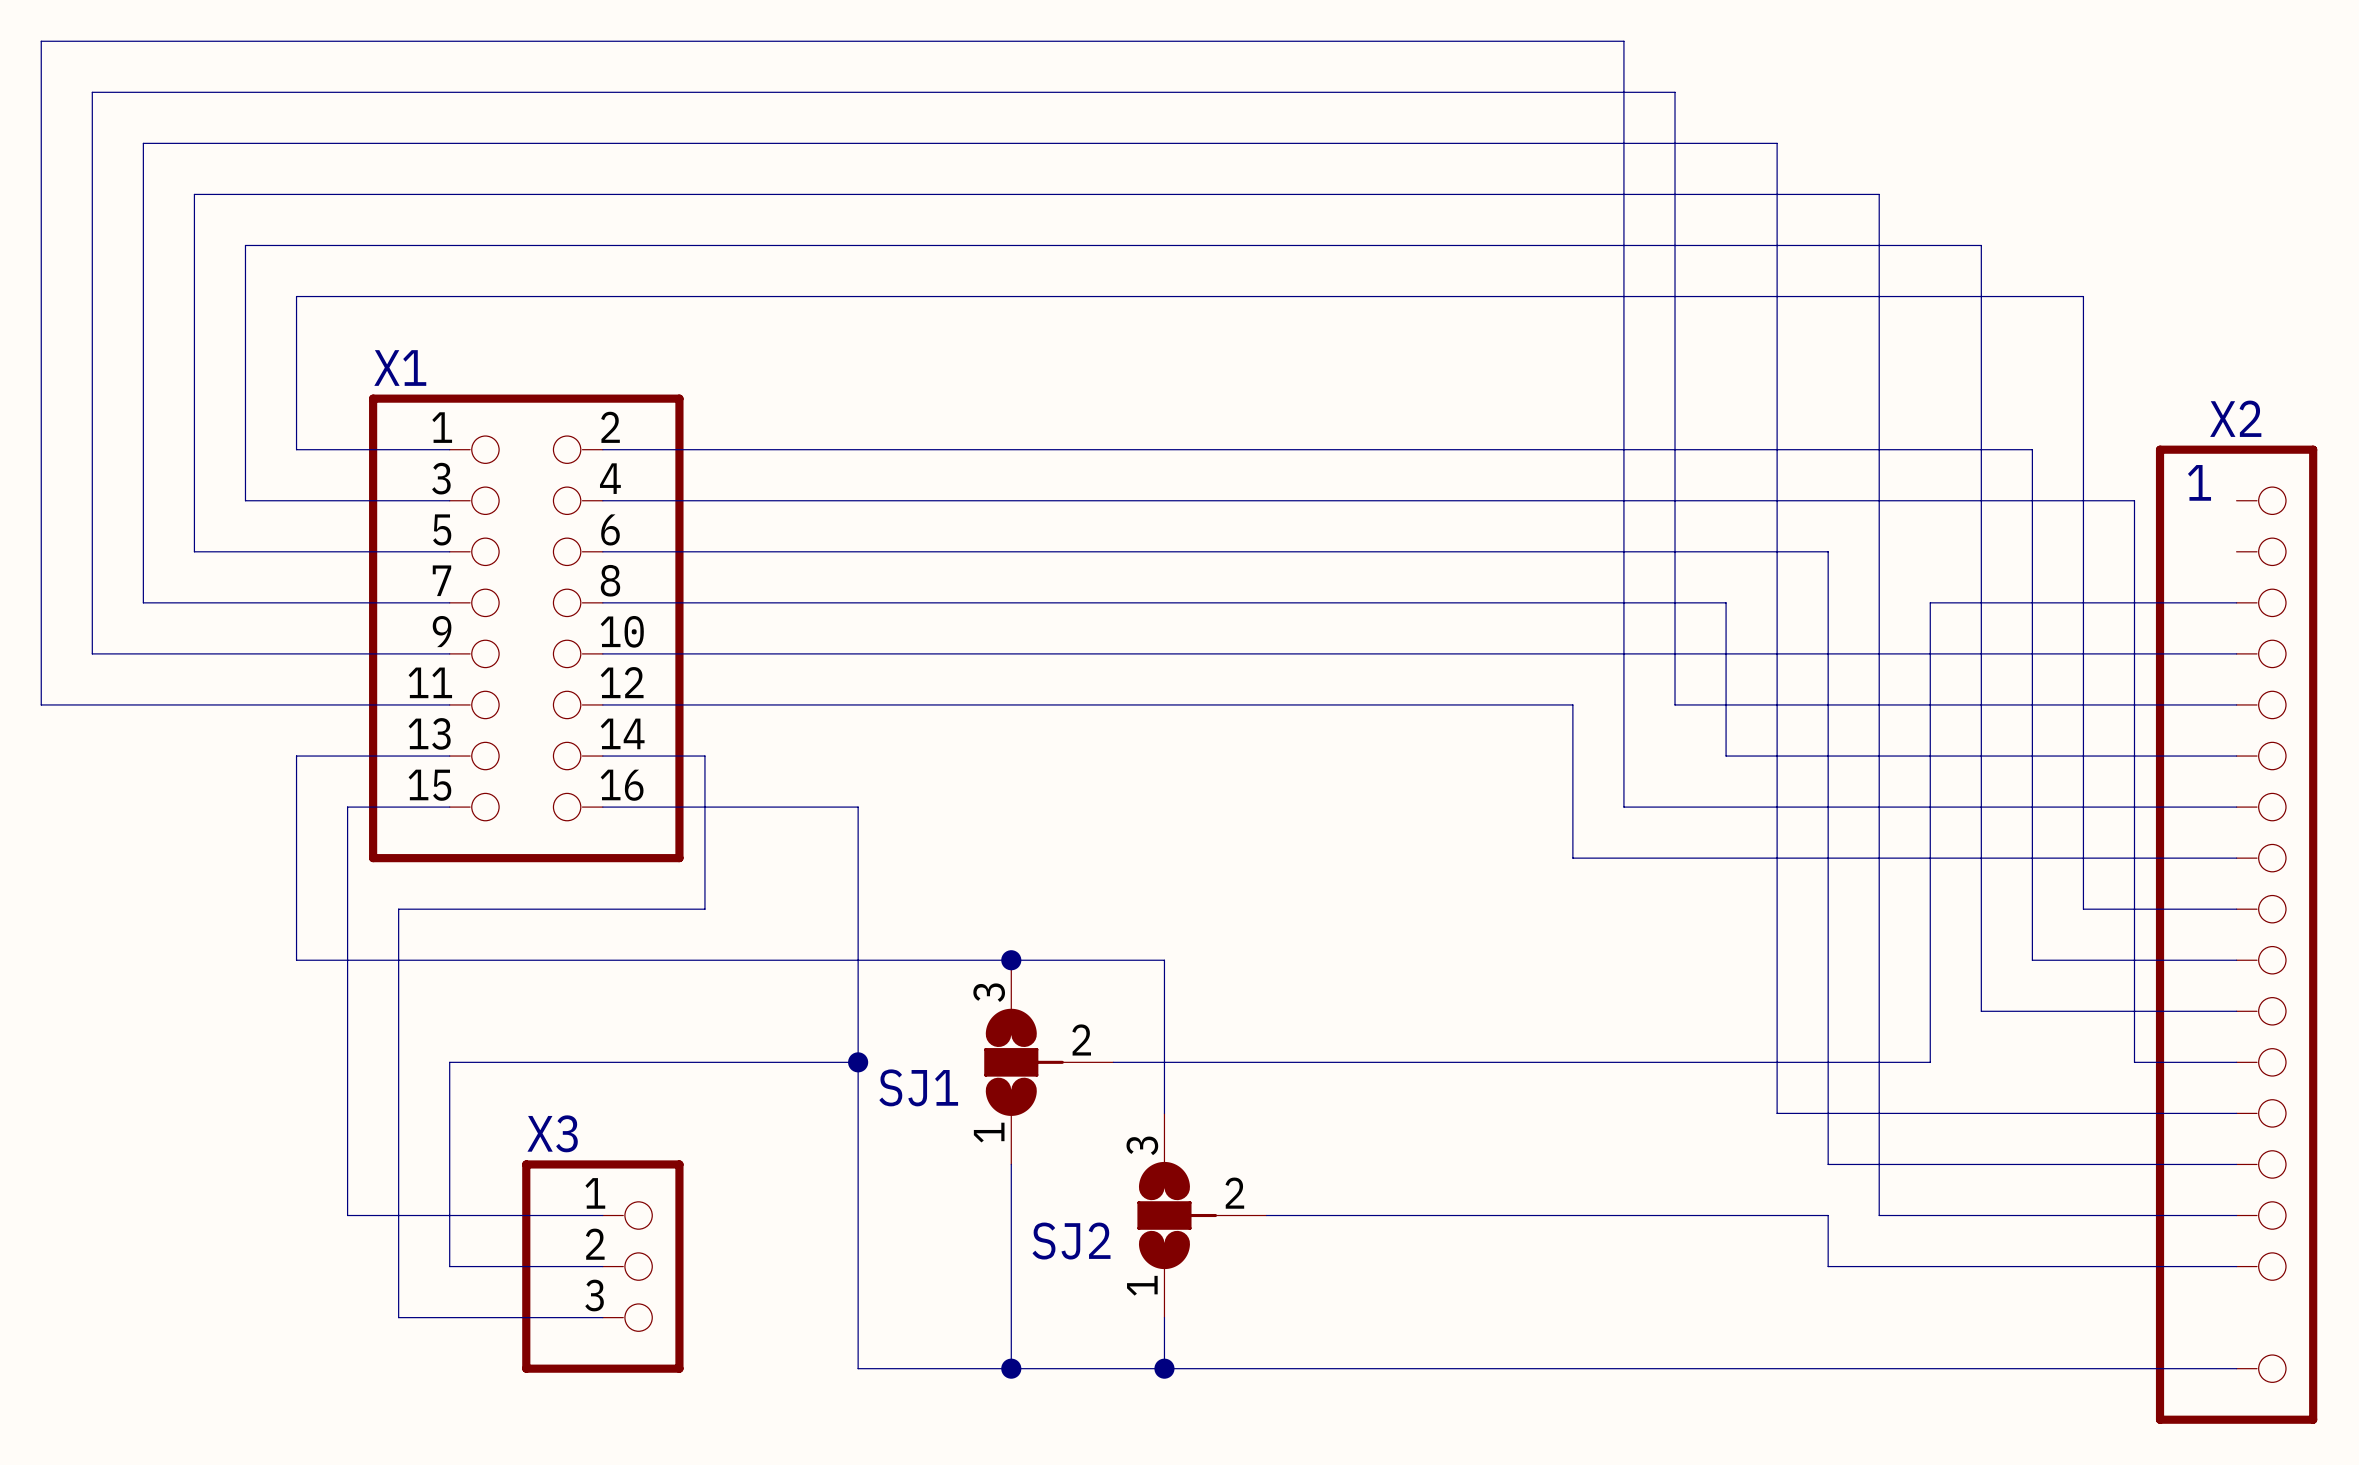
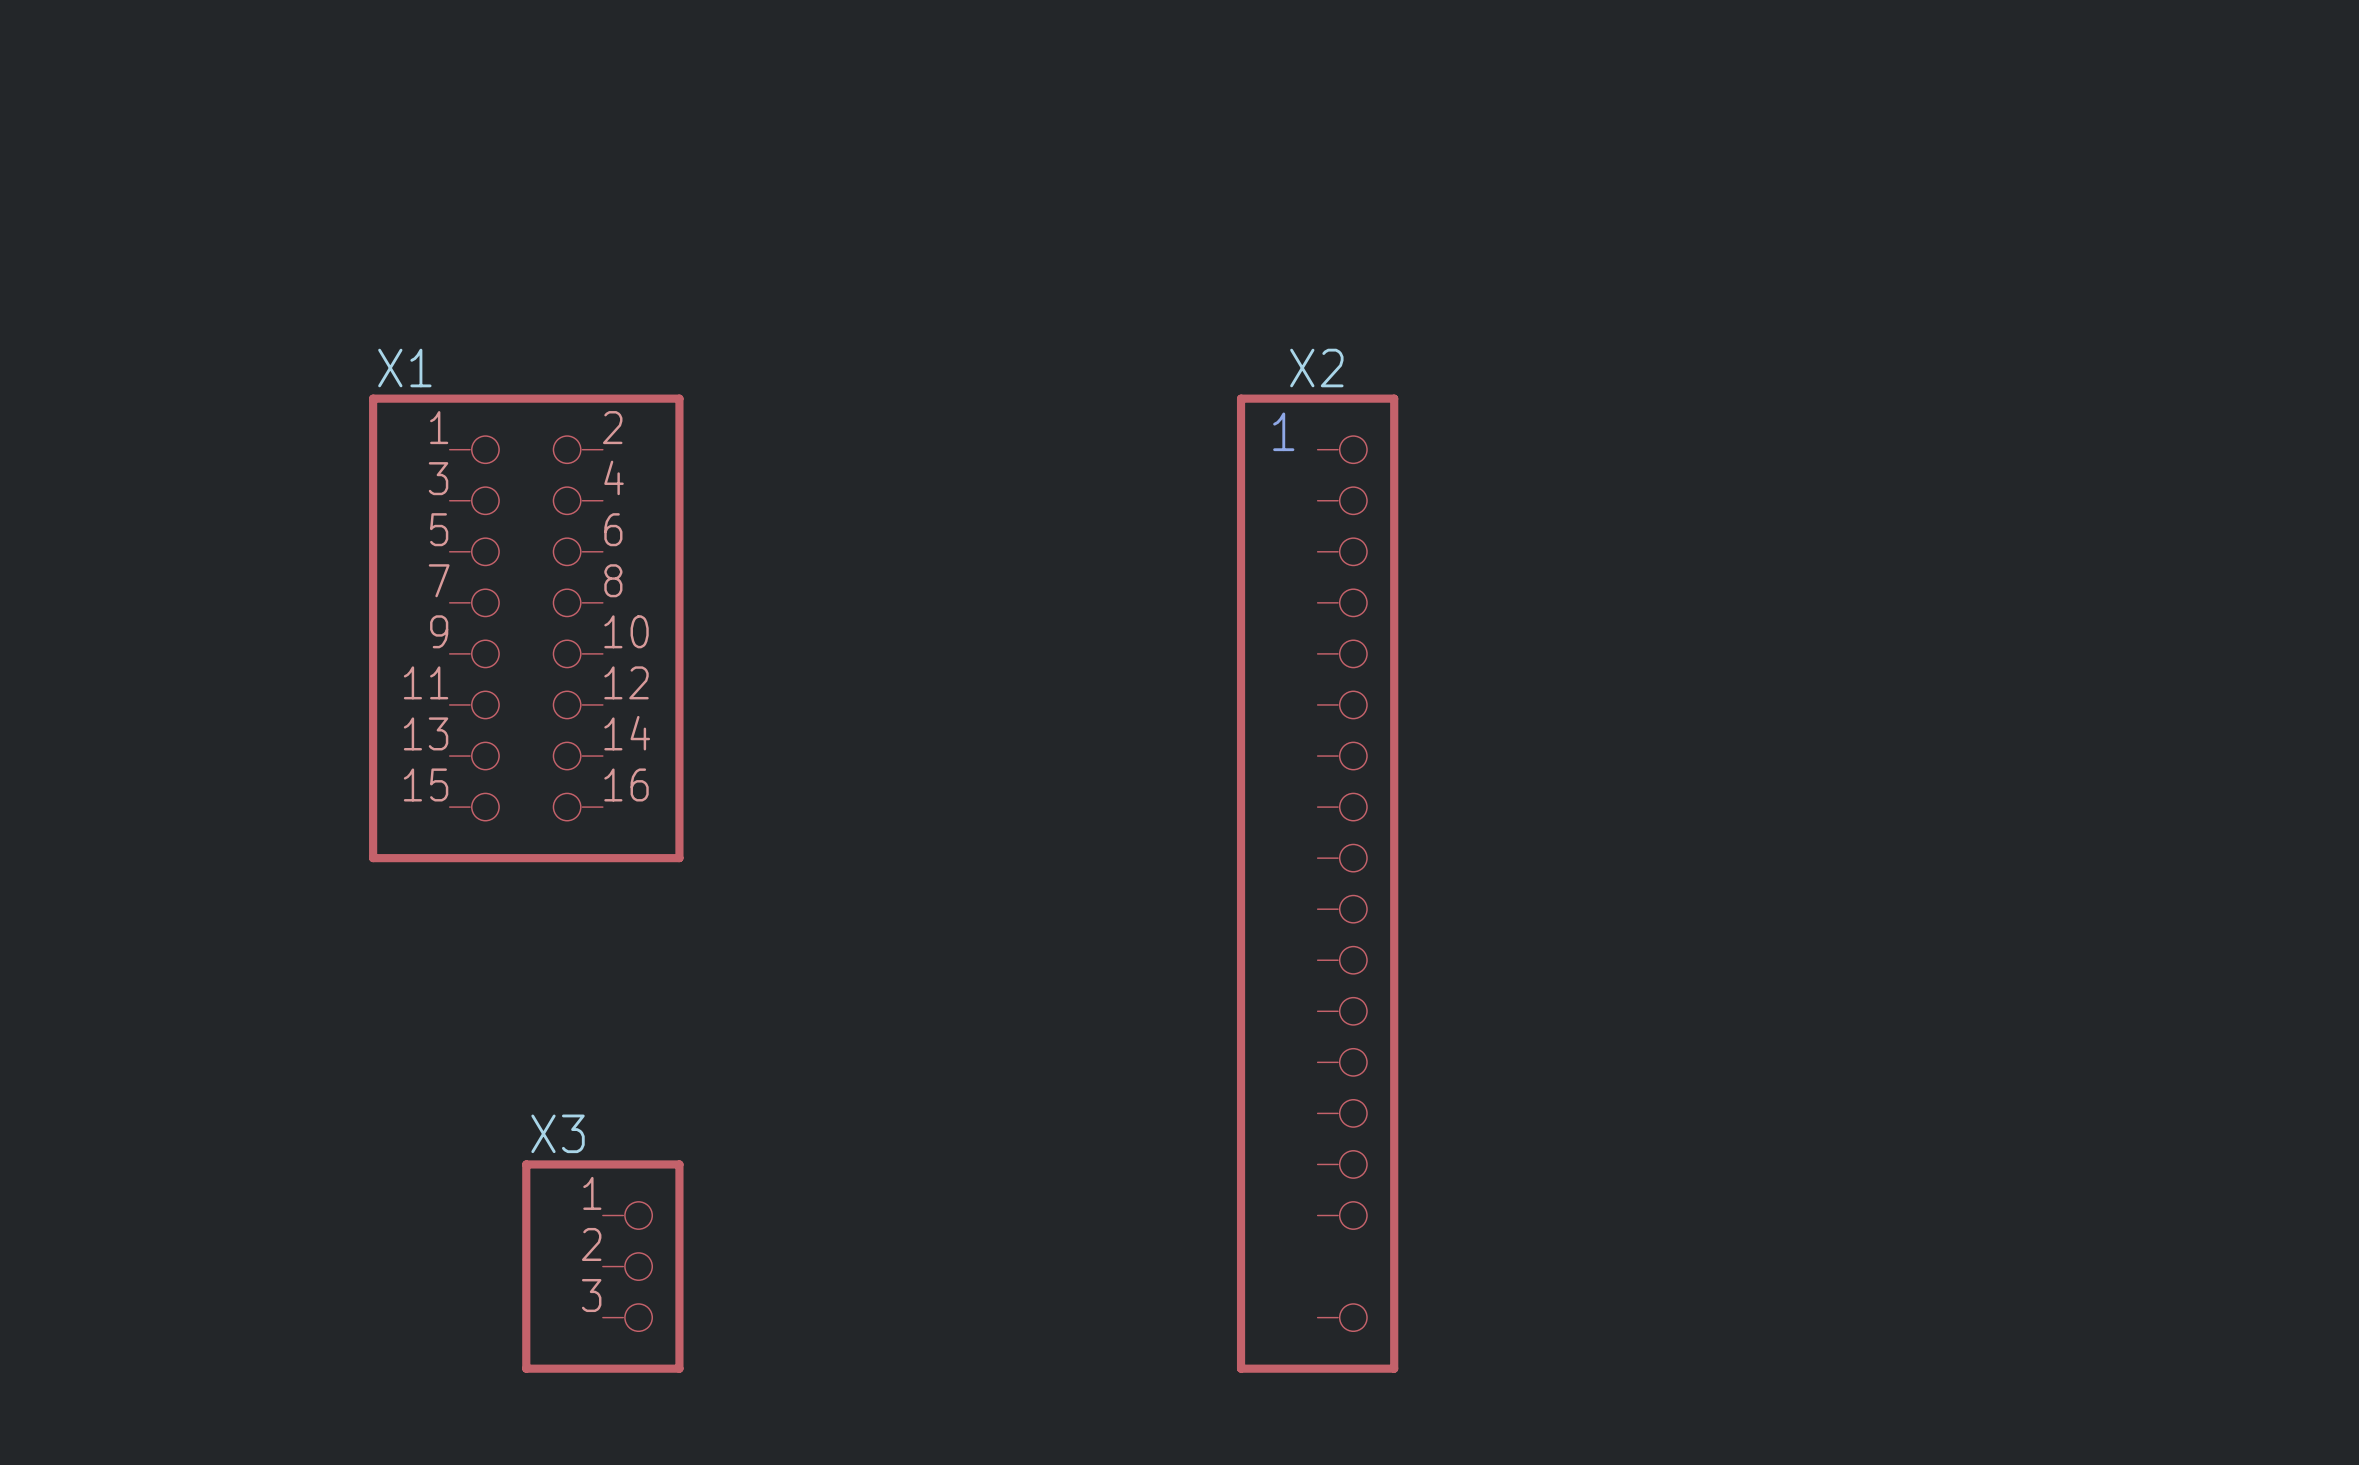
wire: (449, 449) (296, 449) (296, 296) (2083, 296) (2083, 909) (2236, 909) -> none
wire: (602, 449) (2032, 449) (2032, 960) (2236, 960) -> none
wire: (449, 500) (245, 500) (245, 245) (1981, 245) (1981, 1011) (2236, 1011) -> none
wire: (602, 500) (2134, 500) (2134, 1062) (2236, 1062) -> none
wire: (449, 551) (194, 551) (194, 194) (1879, 194) (1879, 1215) (2236, 1215) -> none
wire: (602, 551) (1828, 551) (1828, 1164) (2236, 1164) -> none
wire: (449, 602) (143, 602) (143, 143) (1777, 143) (1777, 1113) (2236, 1113) -> none
wire: (602, 602) (1726, 602) (1726, 756) (2236, 756) -> none
wire: (2236, 602) (1930, 602) (1930, 1062) (1113, 1062) -> none
wire: (449, 653) (92, 653) (92, 92) (1675, 92) (1675, 704) (2236, 704) -> none
wire: (602, 653) (2236, 653) -> none
wire: (449, 704) (41, 704) (41, 41) (1623, 41) (1623, 807) (2236, 807) -> none
wire: (602, 704) (1572, 704) (1572, 858) (2236, 858) -> none
wire: (449, 756) (296, 756) (296, 960) (1164, 960) (1164, 1113) -> none
wire: (602, 756) (704, 756) (704, 909) (398, 909) (398, 1317) (602, 1317) -> none
wire: (449, 807) (347, 807) (347, 1215) (602, 1215) -> none
wire: (602, 807) (858, 807) (858, 1368) (2236, 1368) -> none
X2 position: (2236, 934) -> (1317, 883)
junction: (1011, 960) -> none
wire: (858, 1062) (449, 1062) (449, 1266) (602, 1266) -> none
junction: (858, 1062) -> none
SJ1: (1048, 1062) -> none
wire: (1011, 1164) (1011, 1368) -> none
SJ2: (1201, 1215) -> none
wire: (1266, 1215) (1828, 1215) (1828, 1266) (2236, 1266) -> none
wire: (1164, 1317) (1164, 1368) -> none
junction: (1011, 1368) -> none
junction: (1164, 1368) -> none

